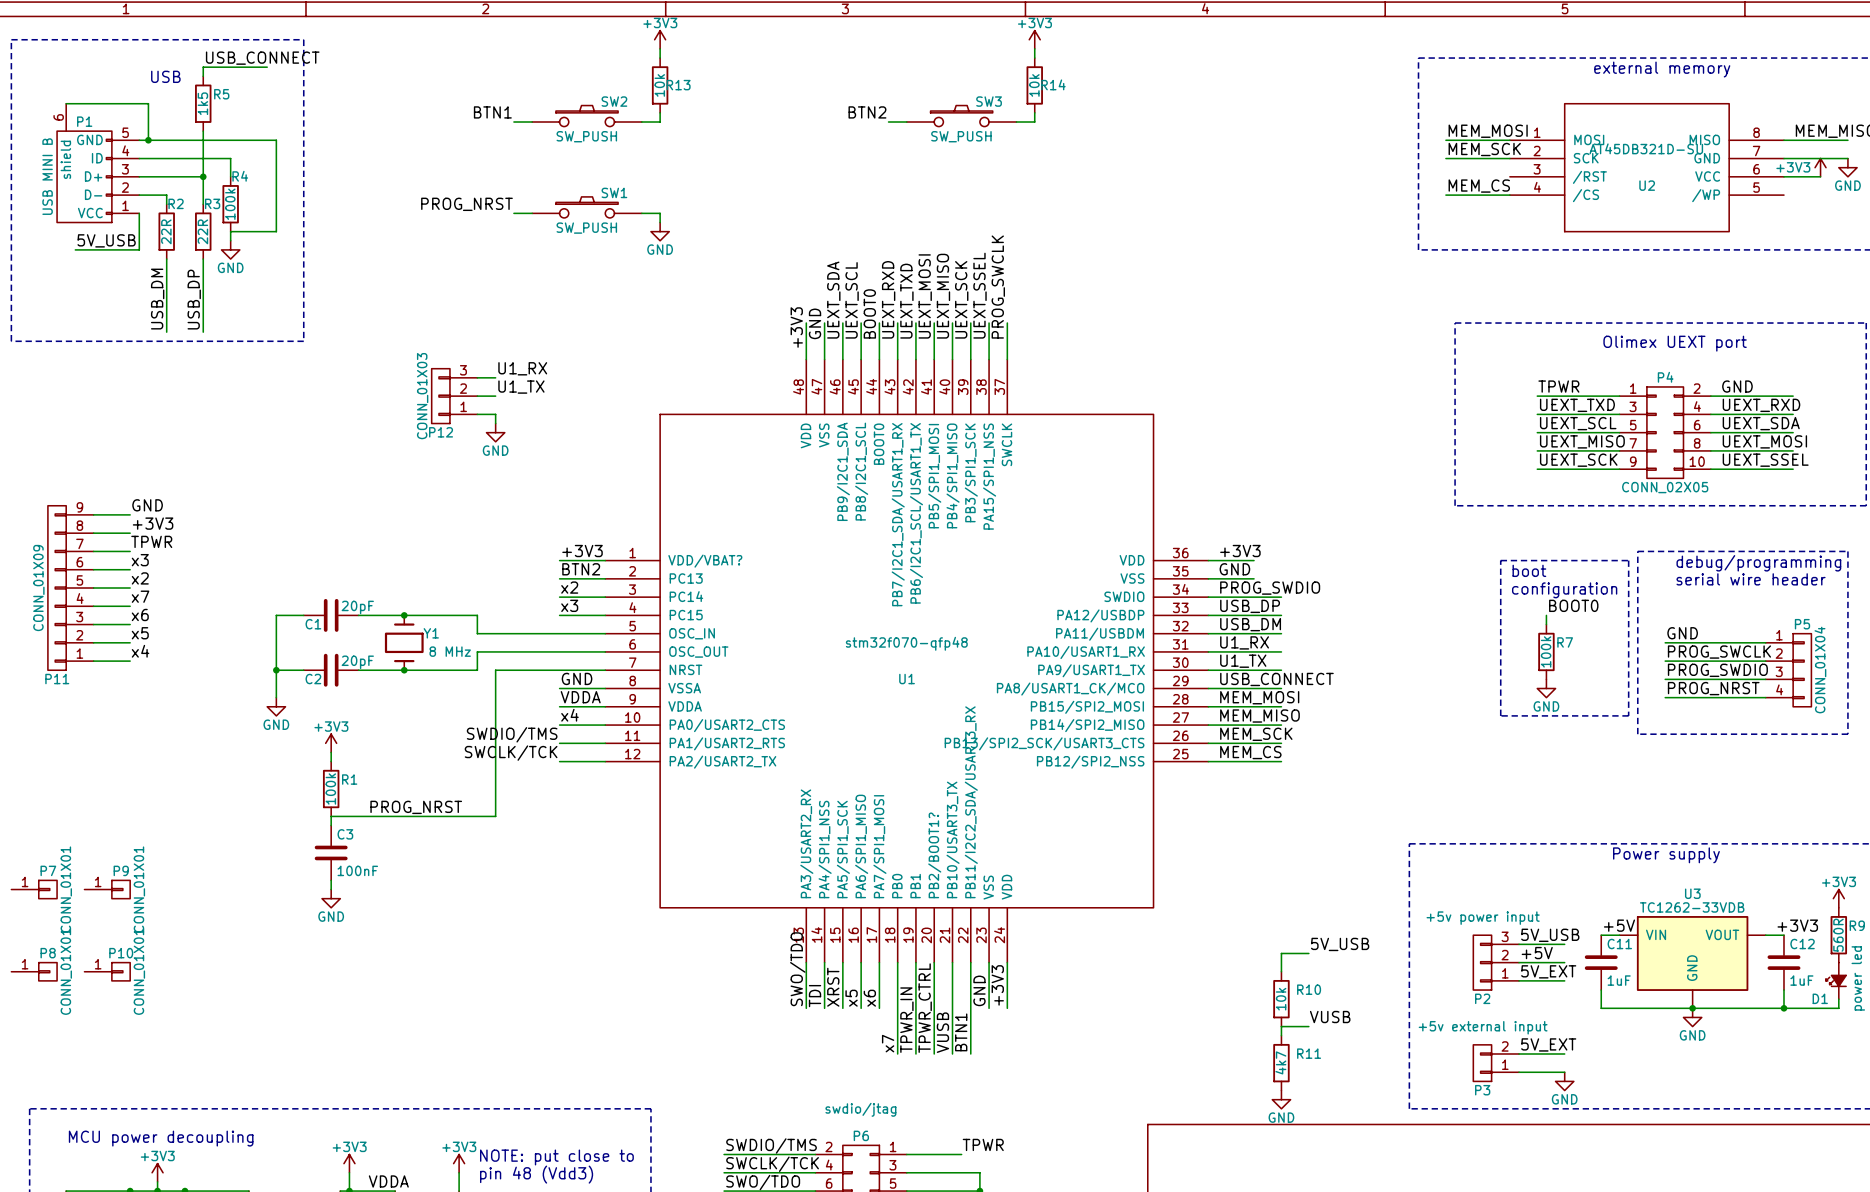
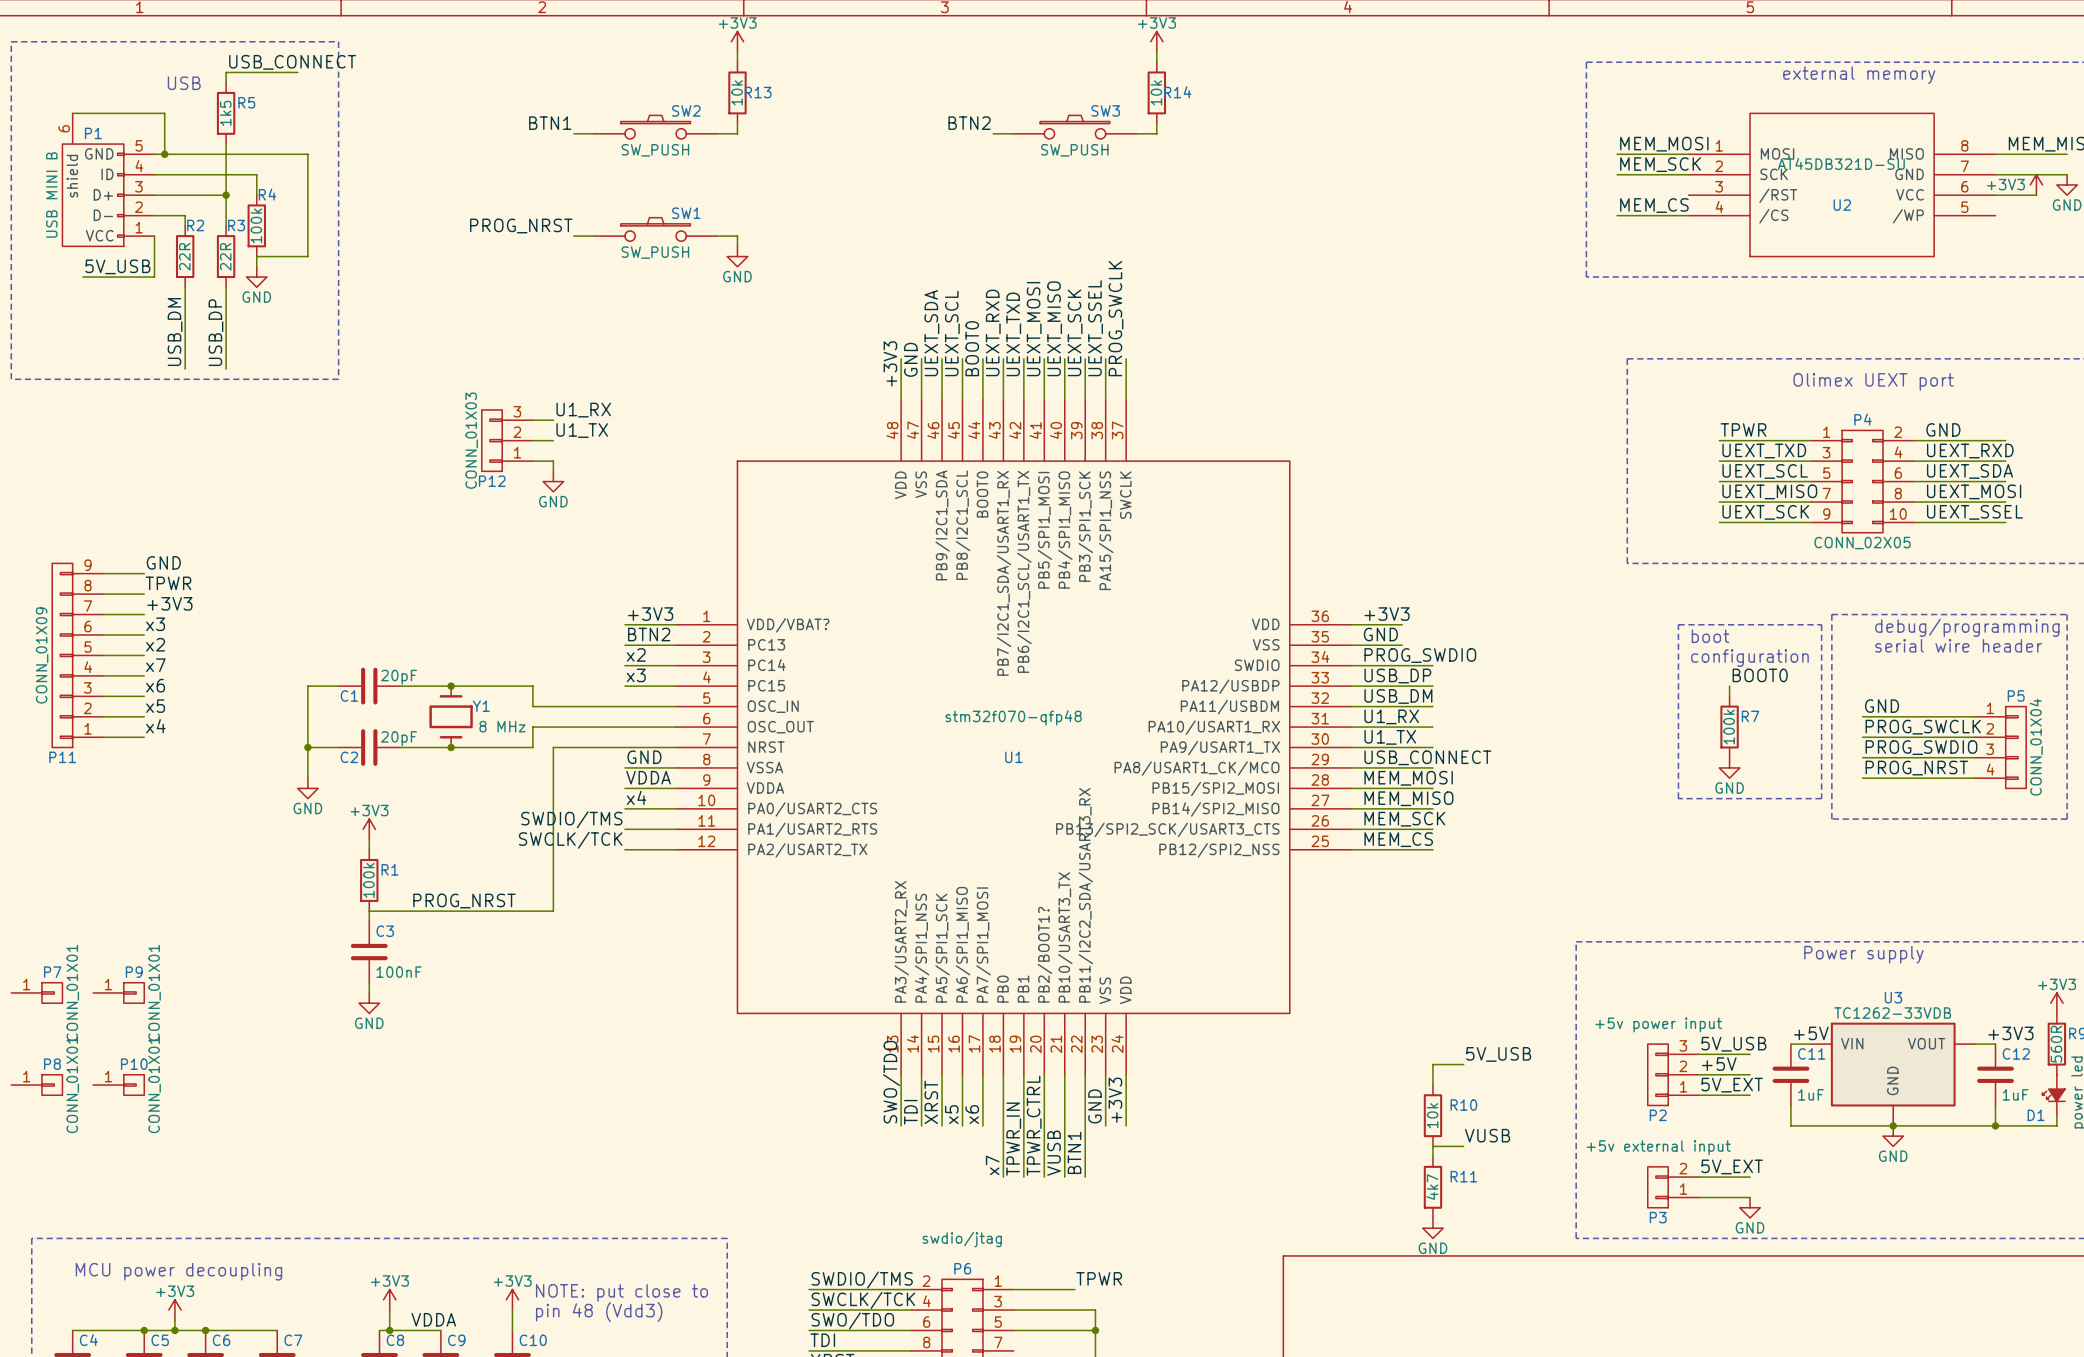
label: +3V3 (153, 523) -> TPWR (168, 583)
label: TPWR (151, 541) -> +3V3 (169, 603)

